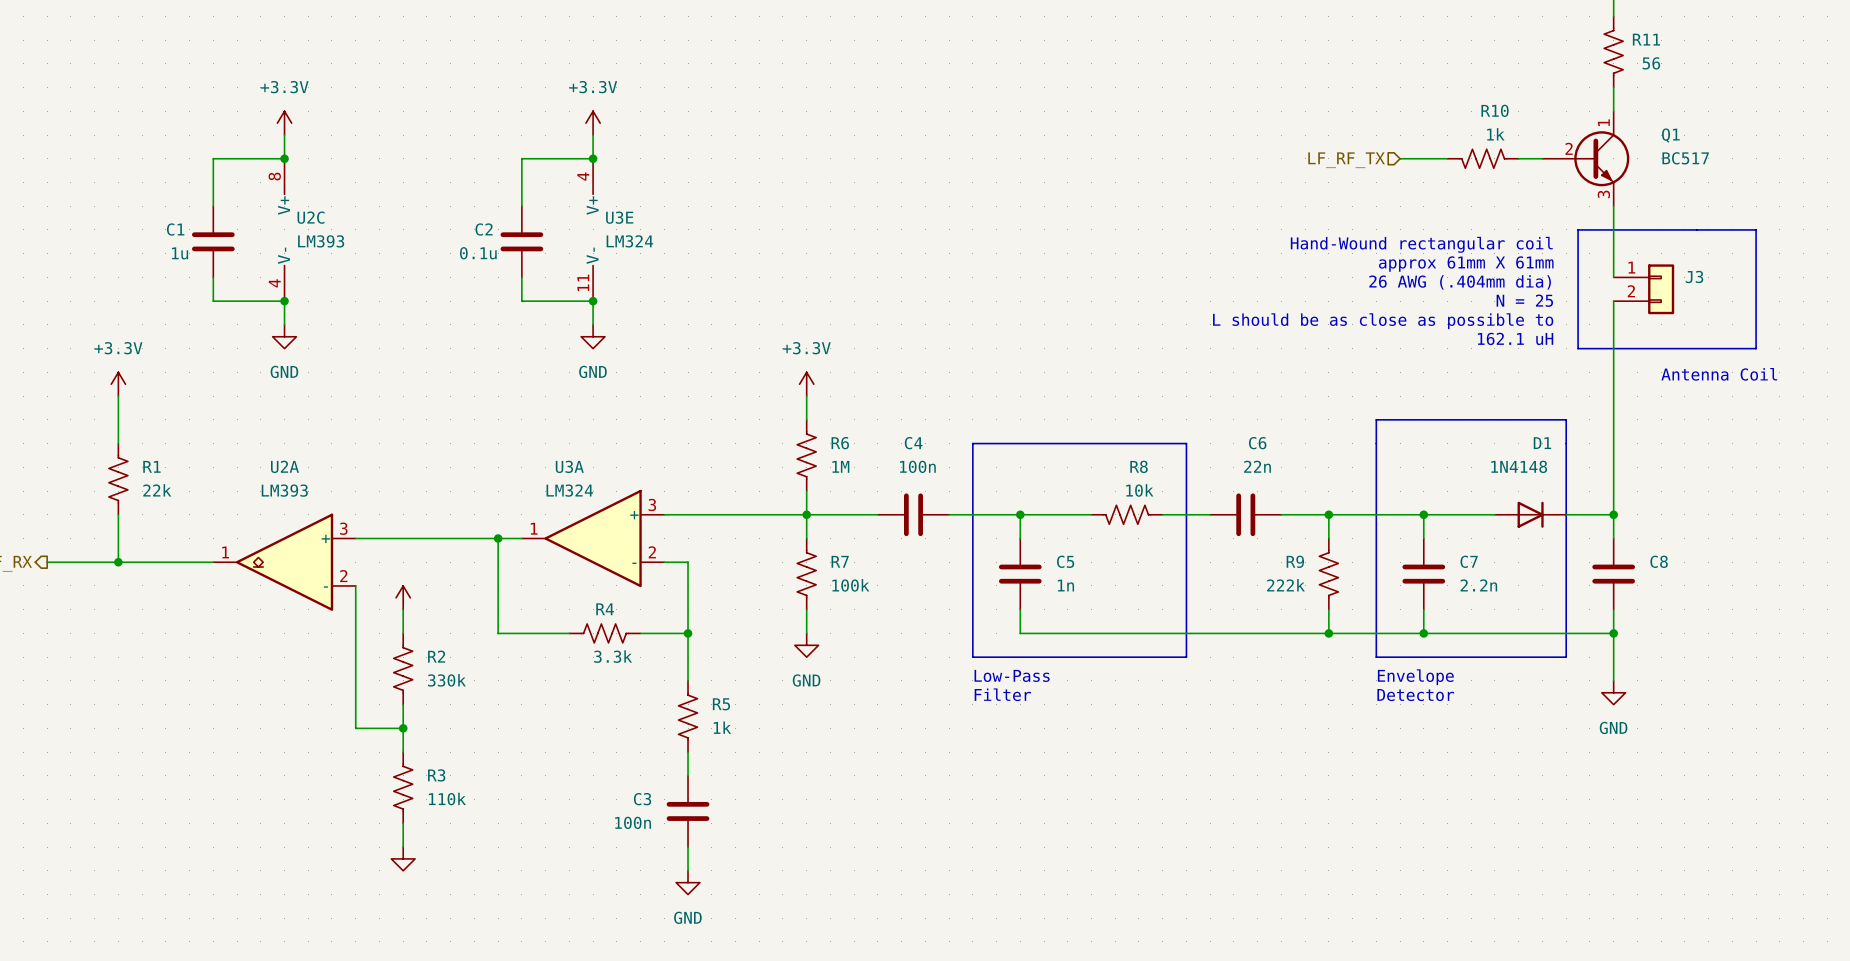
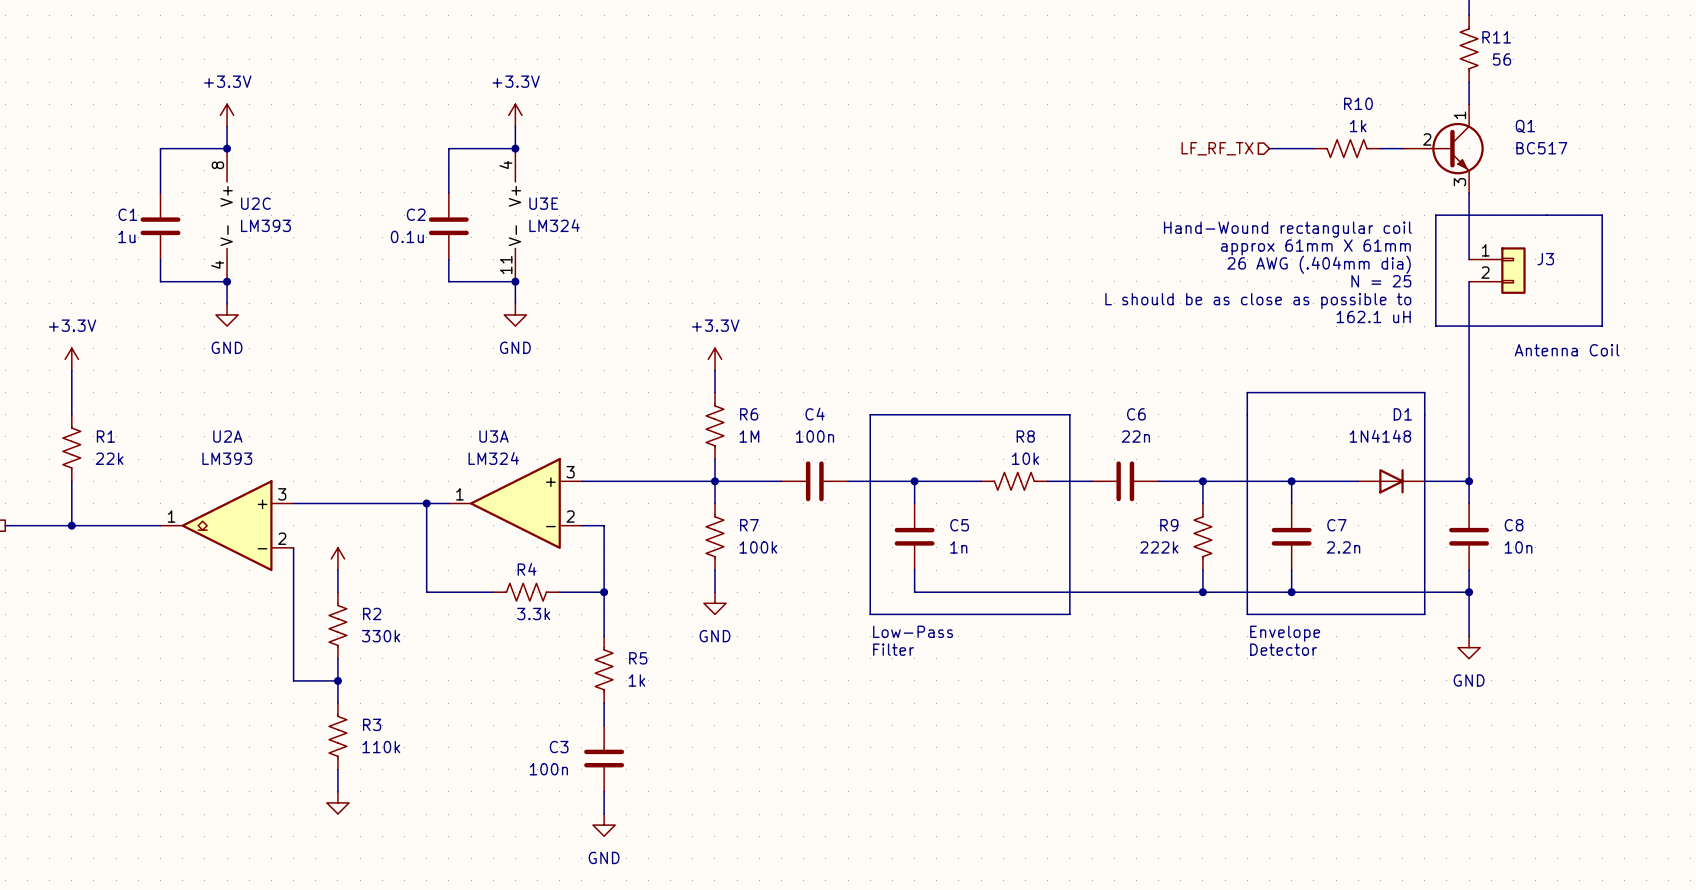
C8 value: none -> 10n (1518, 547)

